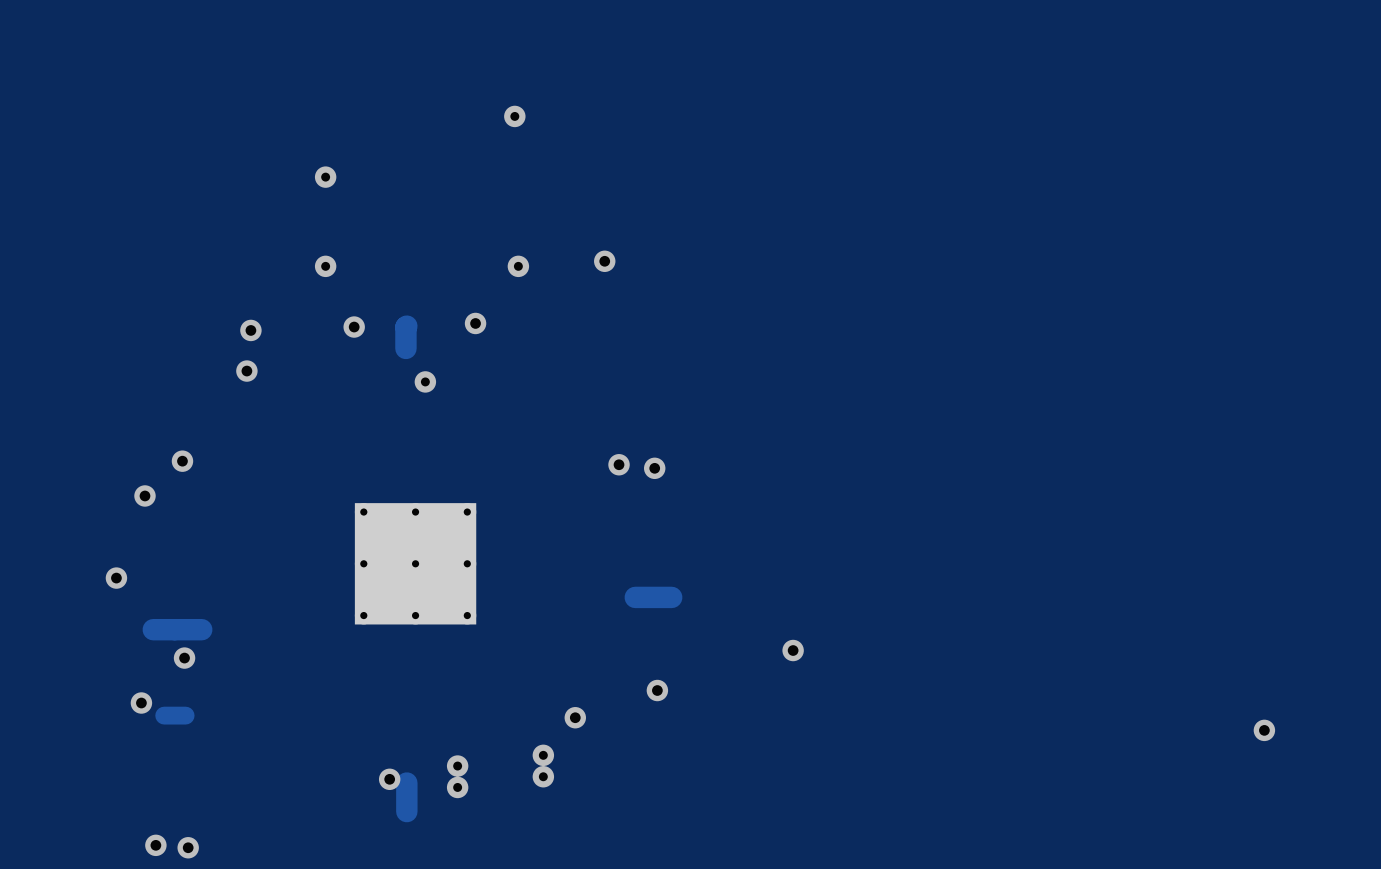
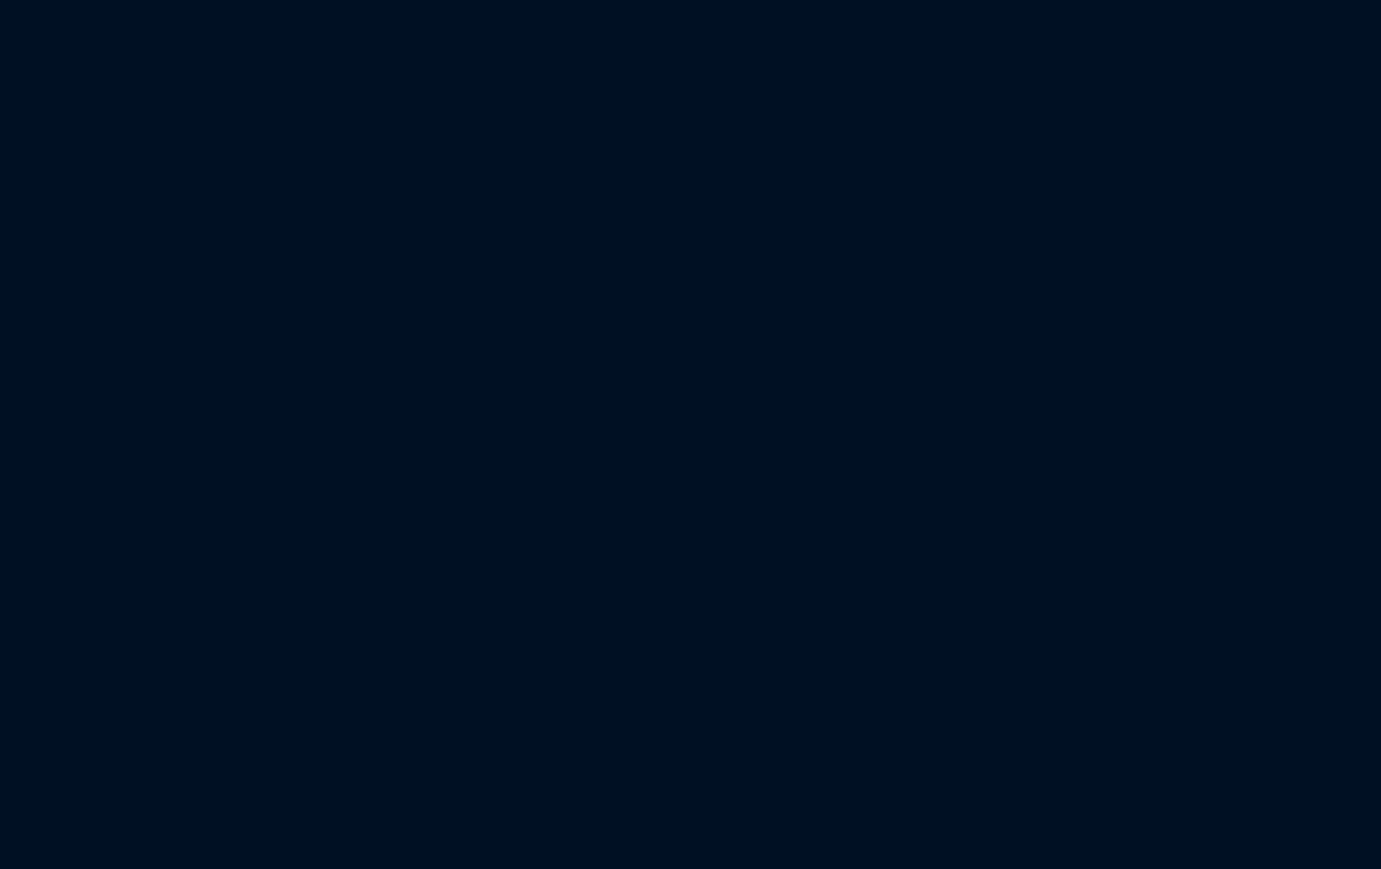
via: (514, 116) -> none
via: (325, 177) -> none
via: (604, 261) -> none
via: (325, 266) -> none
via: (518, 266) -> none
via: (475, 323) -> none
track: (406, 326) (405, 348) -> none
via: (354, 327) -> none
via: (250, 330) -> none
via: (246, 371) -> none
via: (425, 381) -> none
via: (182, 461) -> none
via: (619, 464) -> none
via: (654, 468) -> none
via: (144, 495) -> none
part: (415, 563) -> none
via: (116, 578) -> none
track: (671, 597) (635, 597) -> none
track: (201, 629) (153, 629) -> none
via: (793, 650) -> none
via: (184, 658) -> none
via: (657, 690) -> none
via: (141, 703) -> none
track: (185, 715) (164, 715) -> none
via: (575, 717) -> none
via: (1264, 730) -> none
via: (543, 755) -> none
via: (457, 766) -> none
via: (543, 776) -> none
via: (389, 779) -> none
track: (406, 783) (406, 811) -> none
via: (457, 787) -> none
via: (155, 845) -> none
via: (188, 847) -> none

